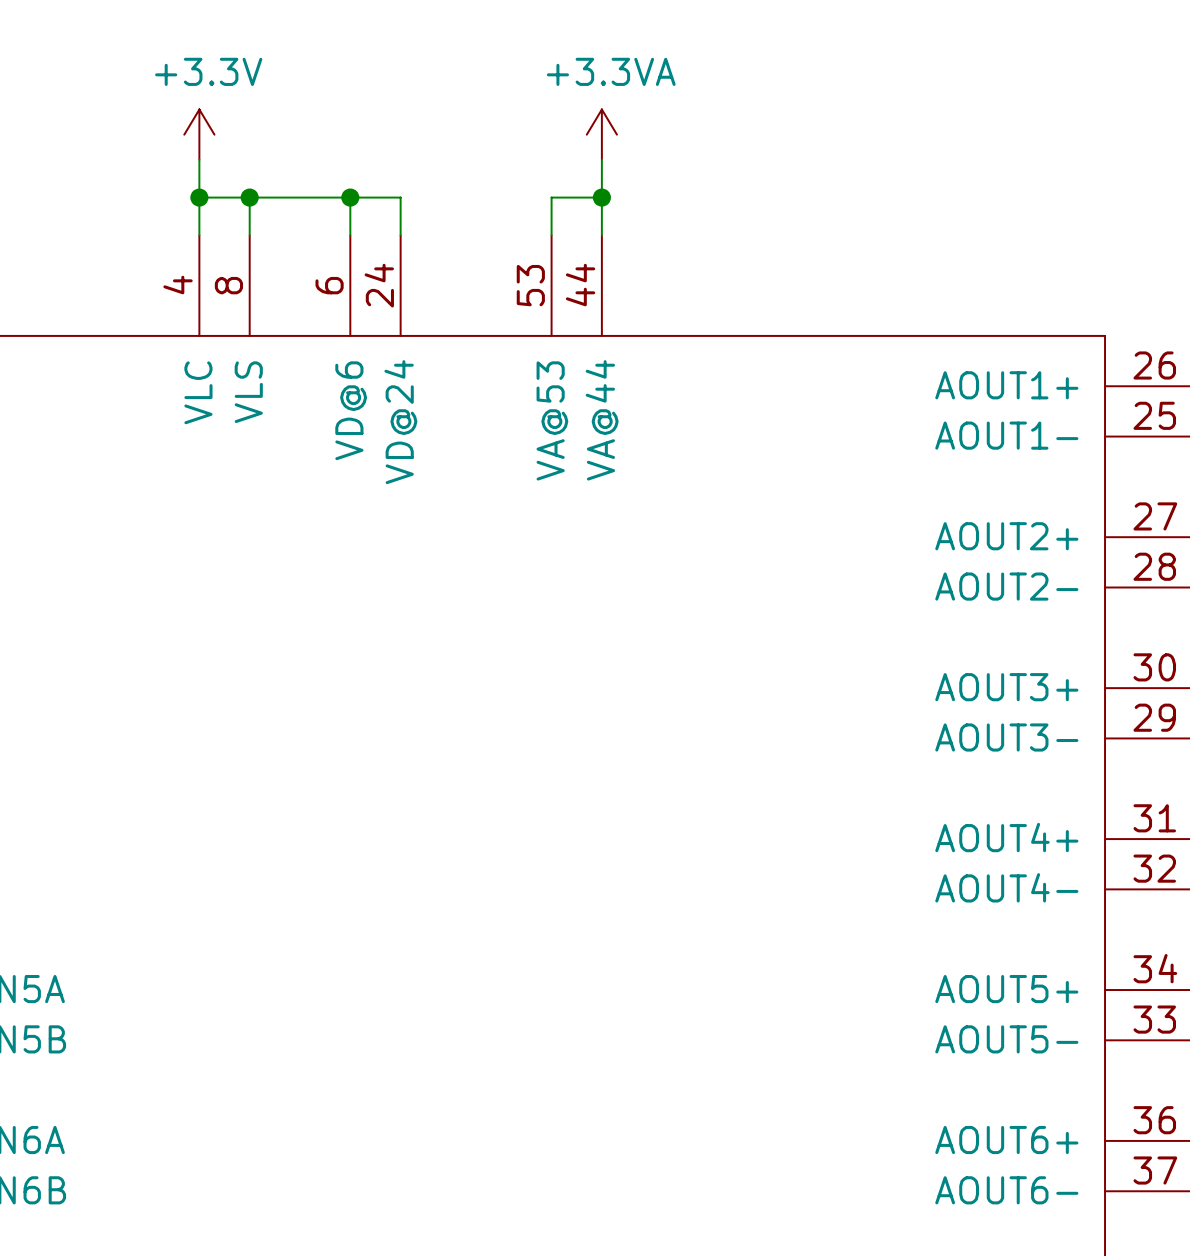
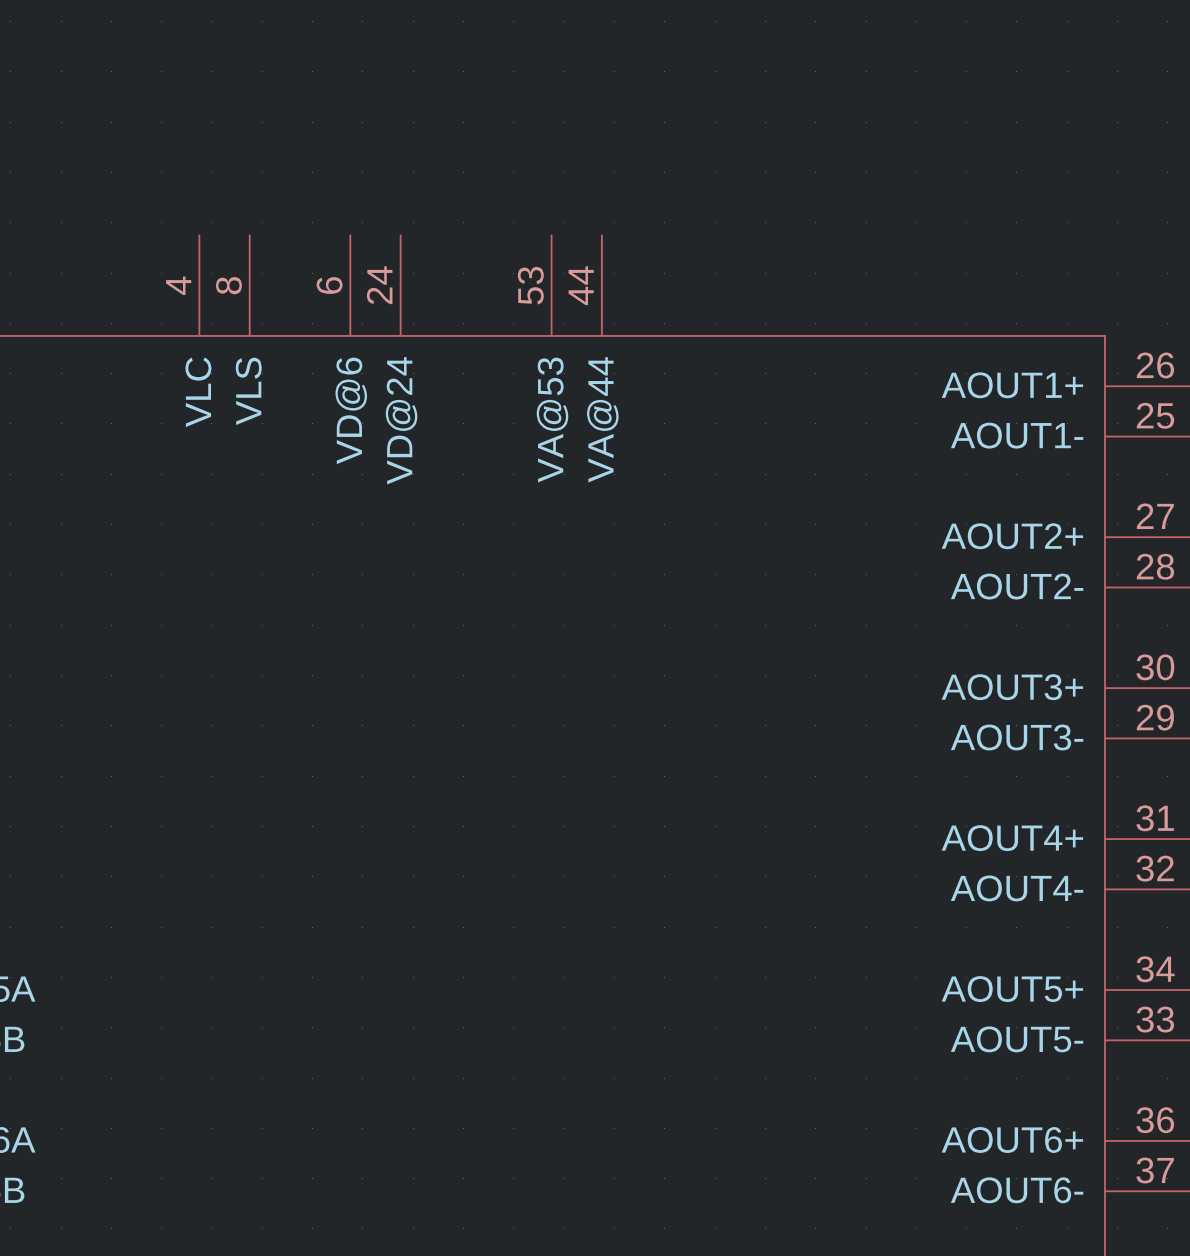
power symbol: +3.3V (199, 134) -> none
power symbol: +3.3VA (601, 134) -> none
wire: (199, 159) (199, 235) -> none
wire: (601, 159) (601, 235) -> none
wire: (199, 197) (400, 197) (400, 235) -> none
junction: (199, 197) -> none
wire: (249, 197) (249, 235) -> none
junction: (249, 197) -> none
wire: (350, 197) (350, 235) -> none
junction: (350, 197) -> none
wire: (601, 197) (551, 197) (551, 235) -> none
junction: (601, 197) -> none

